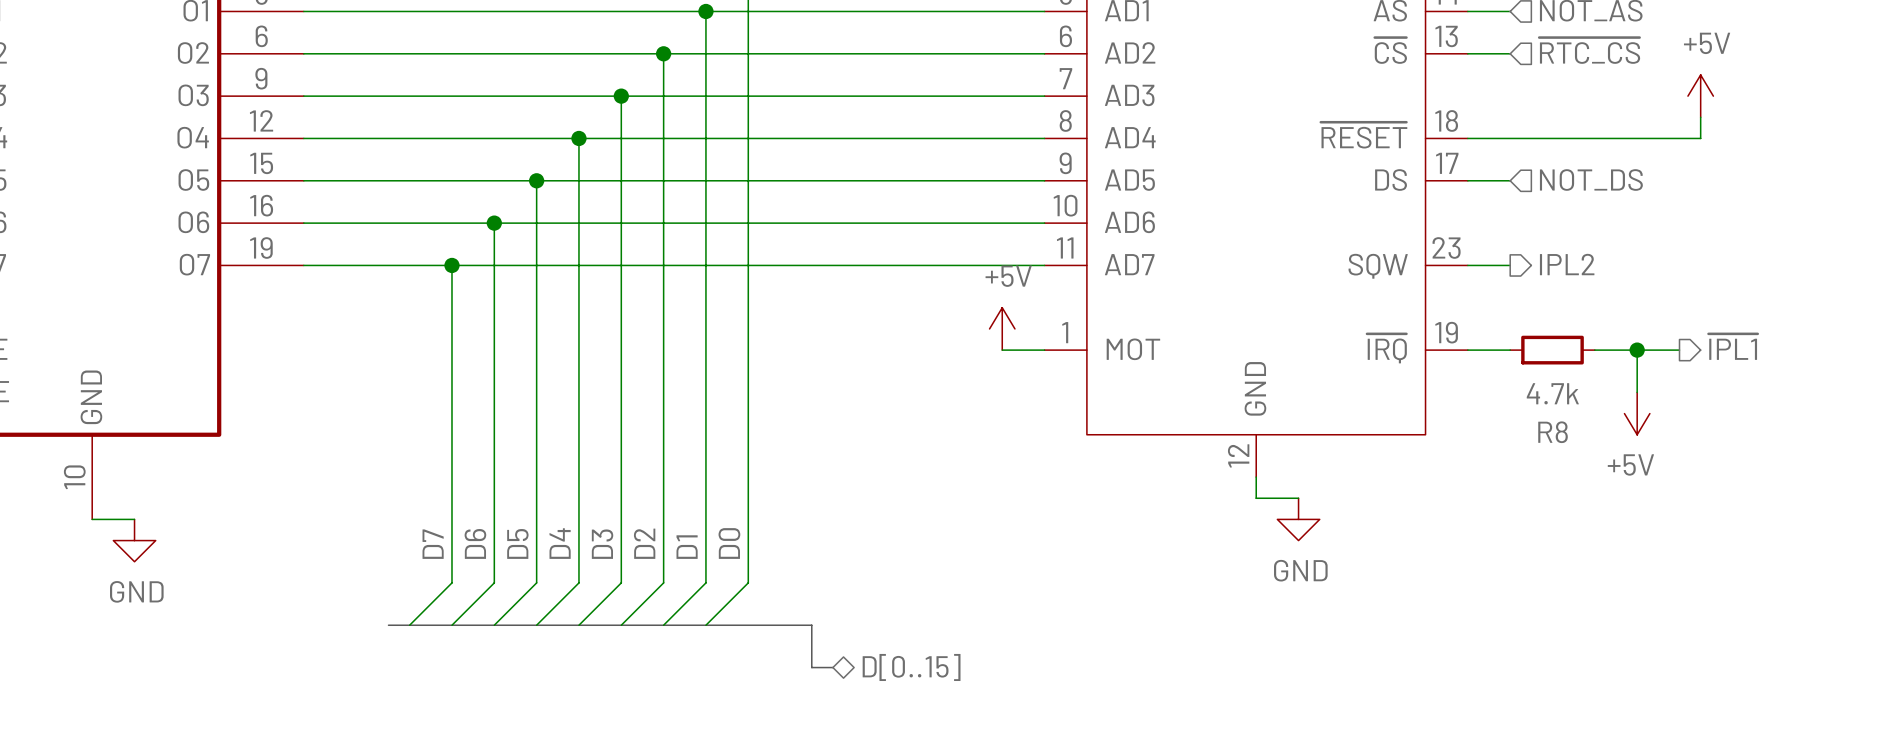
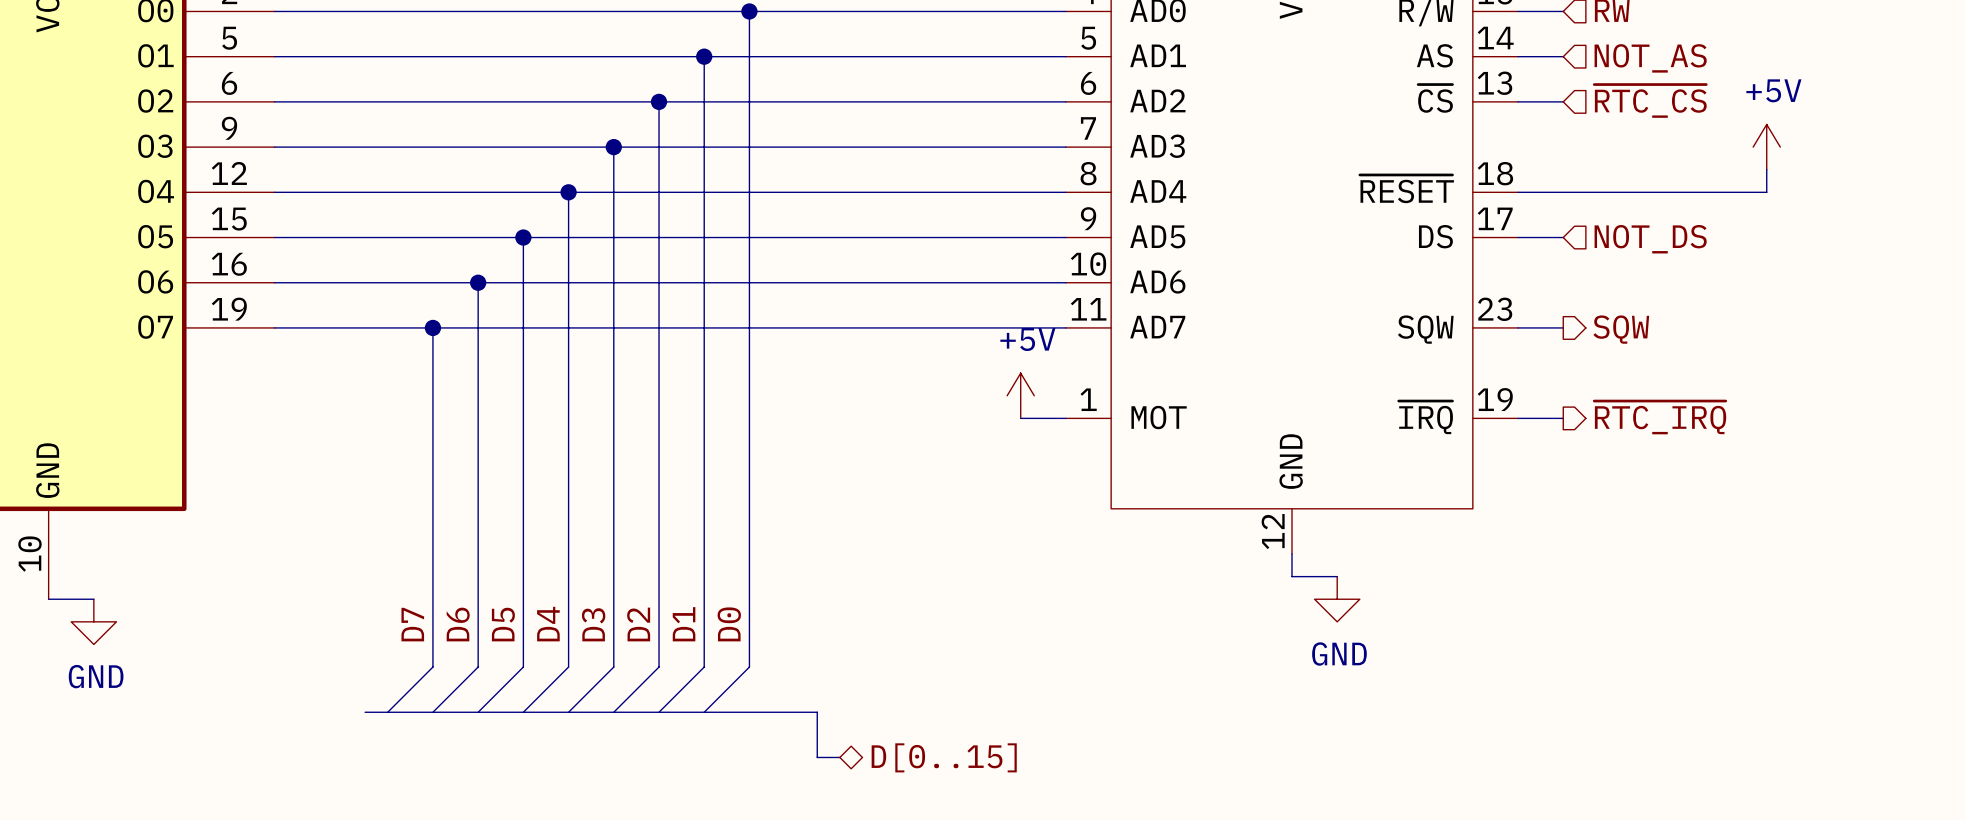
hierarchical label: IPL2 (1567, 264) -> SQW (1621, 329)
hierarchical label: ~{IPL1} (1733, 346) -> none
hierarchical label: none -> ~{RTC_IRQ} (1660, 417)
R8: 4.7k (1552, 350) -> none
wire: (1594, 350) (1679, 350) -> none
wire: (1637, 350) (1637, 392) -> none
junction: (1637, 350) -> none
power symbol: +5V (1637, 413) -> none

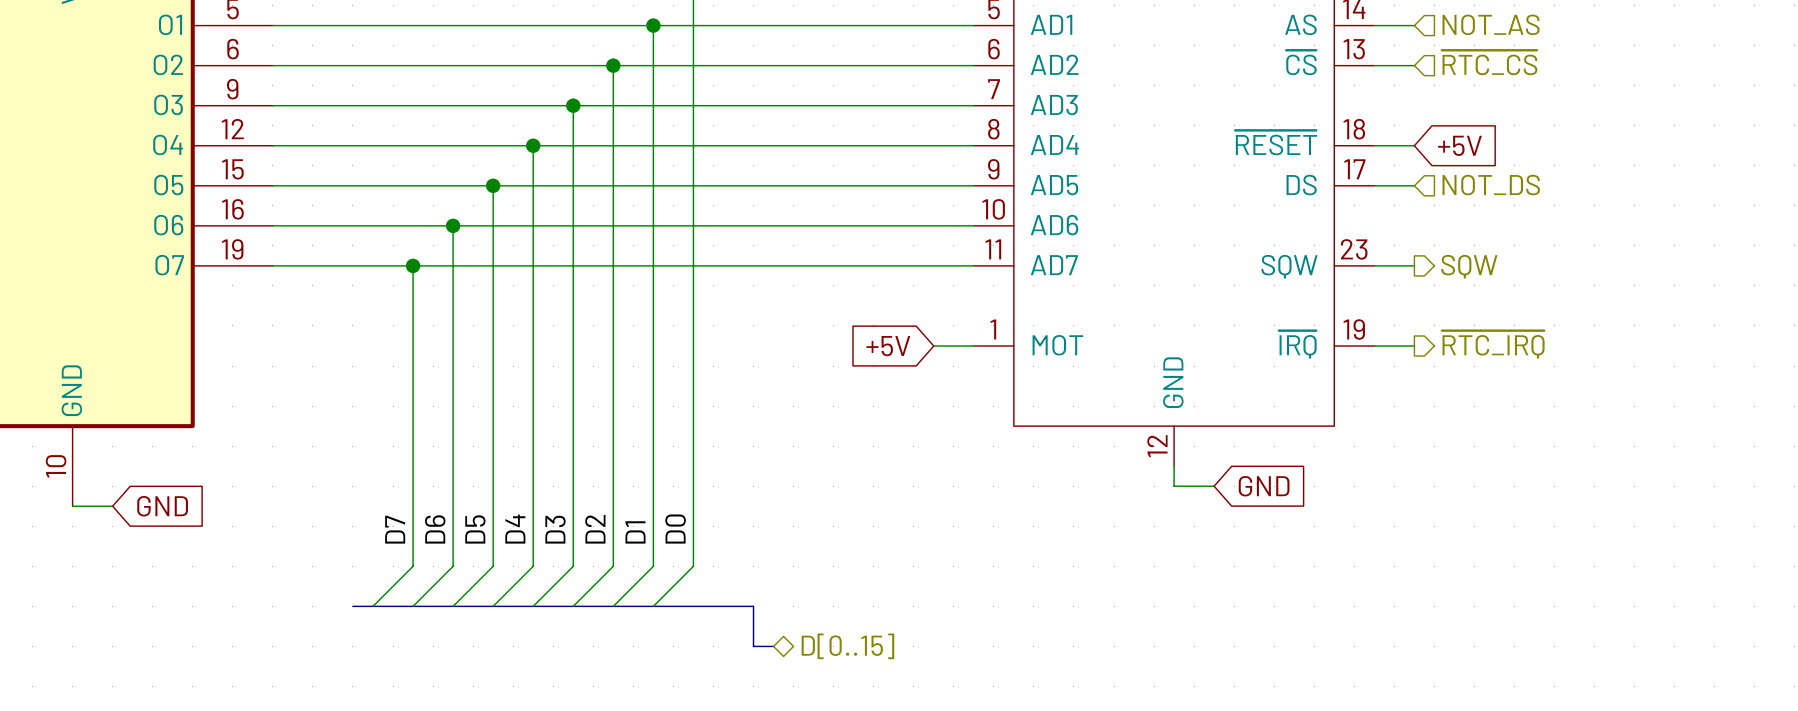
power symbol: +5V (1766, 147) -> none
wire: (1766, 169) (1766, 192) (1563, 192) -> none
global label: none -> +5V (1459, 145)
power symbol: +5V (1020, 395) -> none
global label: none -> +5V (888, 346)
global label: none -> GND (1264, 486)
global label: none -> GND (162, 506)
power symbol: GND (1337, 599) -> none
power symbol: GND (93, 621) -> none

